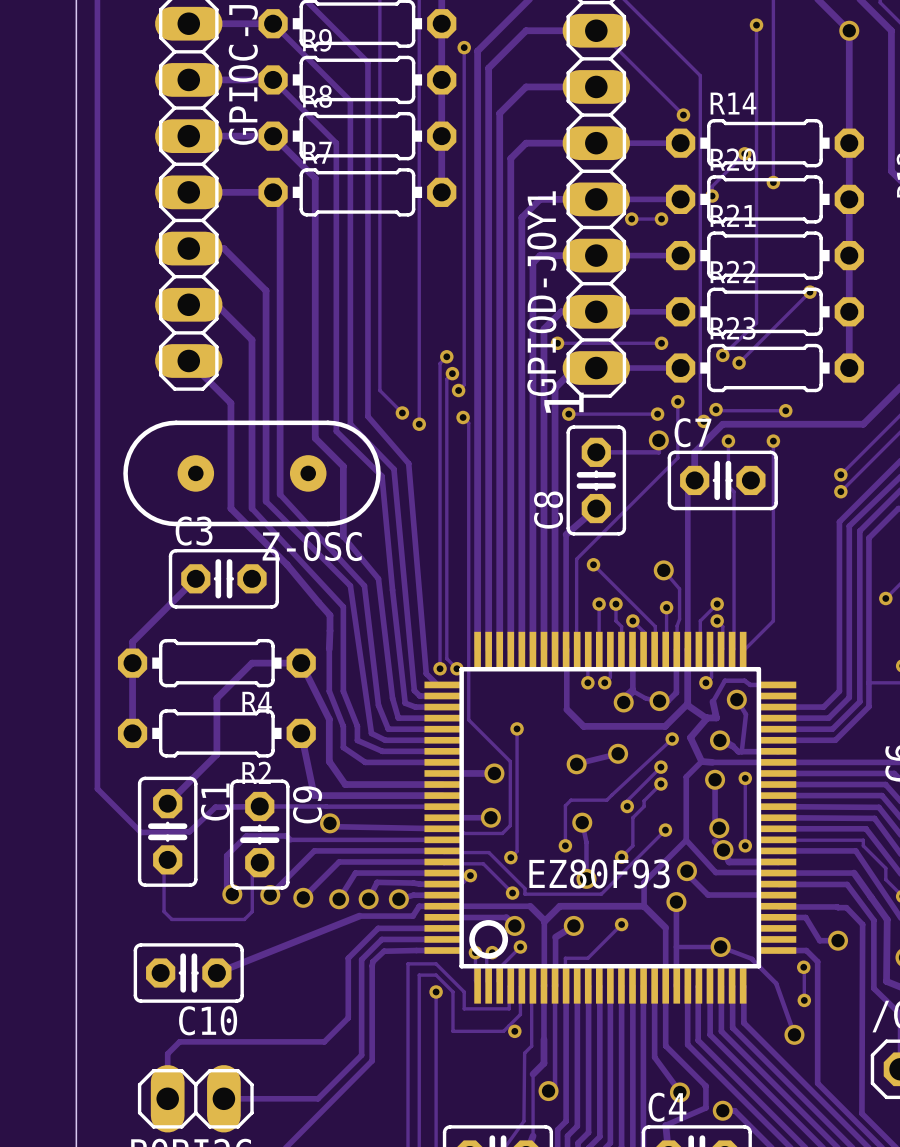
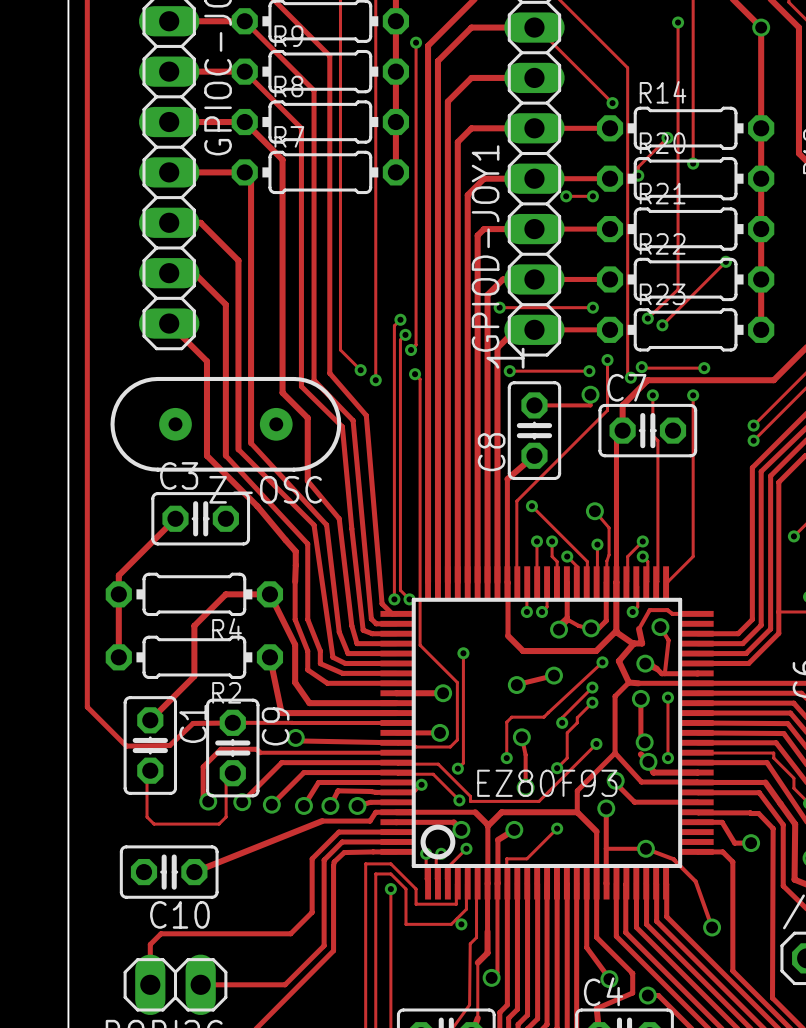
track: (803, 967) (804, 1000) -> none
via: (803, 967) -> none
via: (804, 1000) -> none

